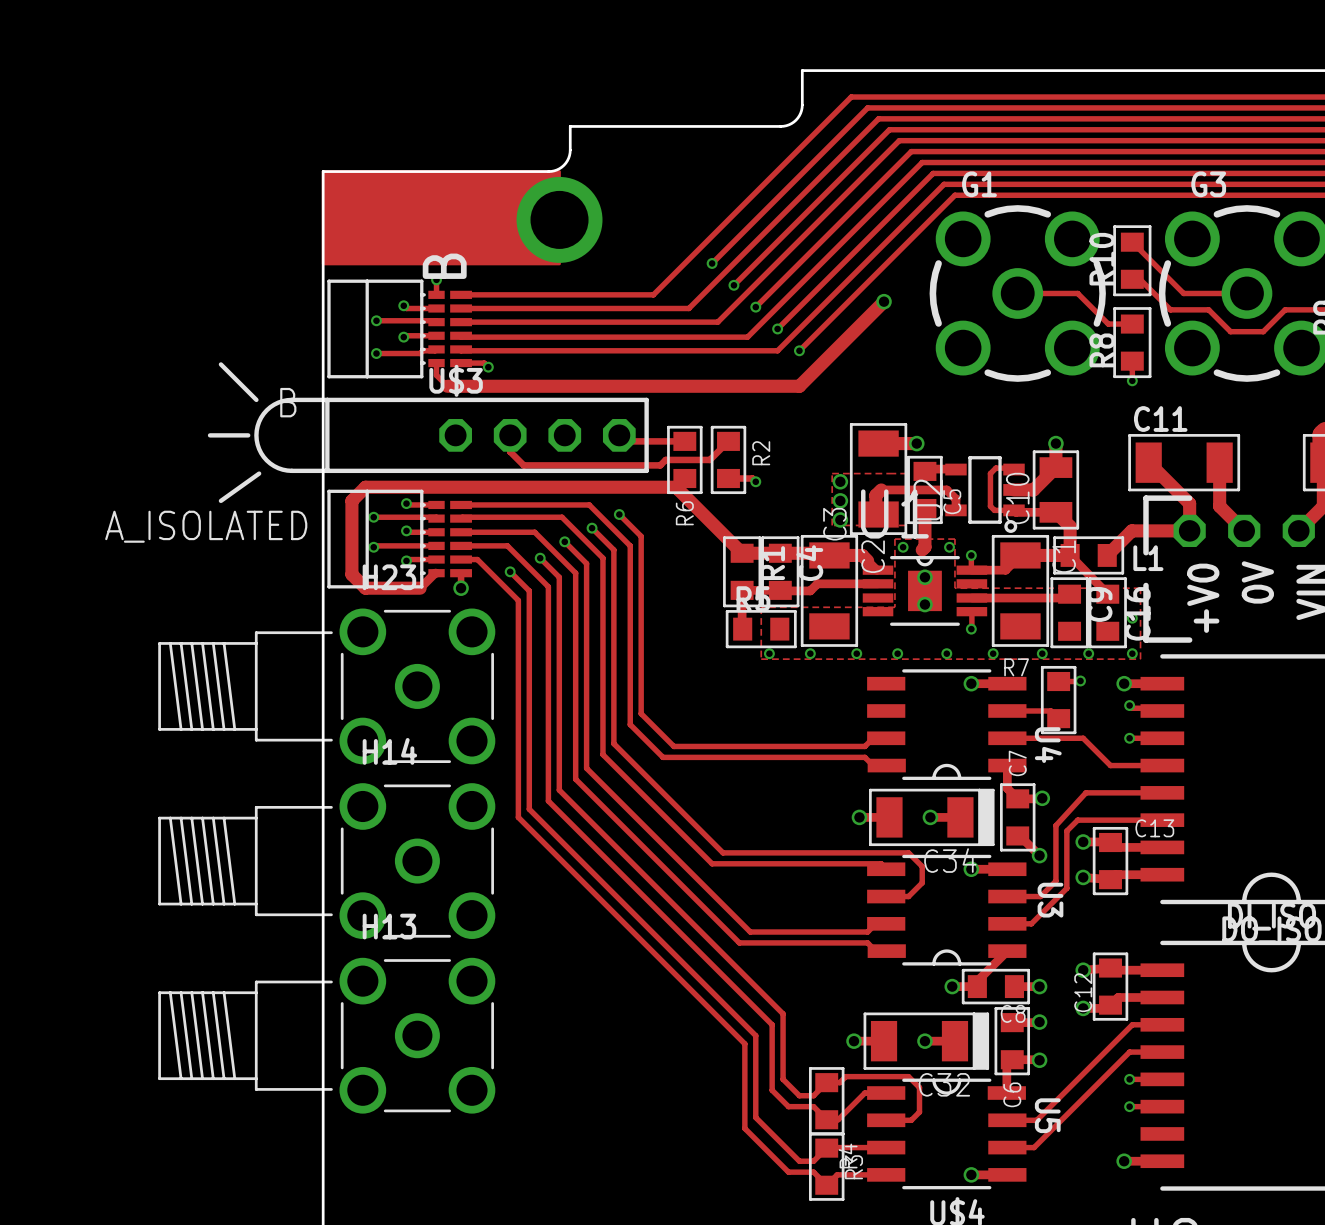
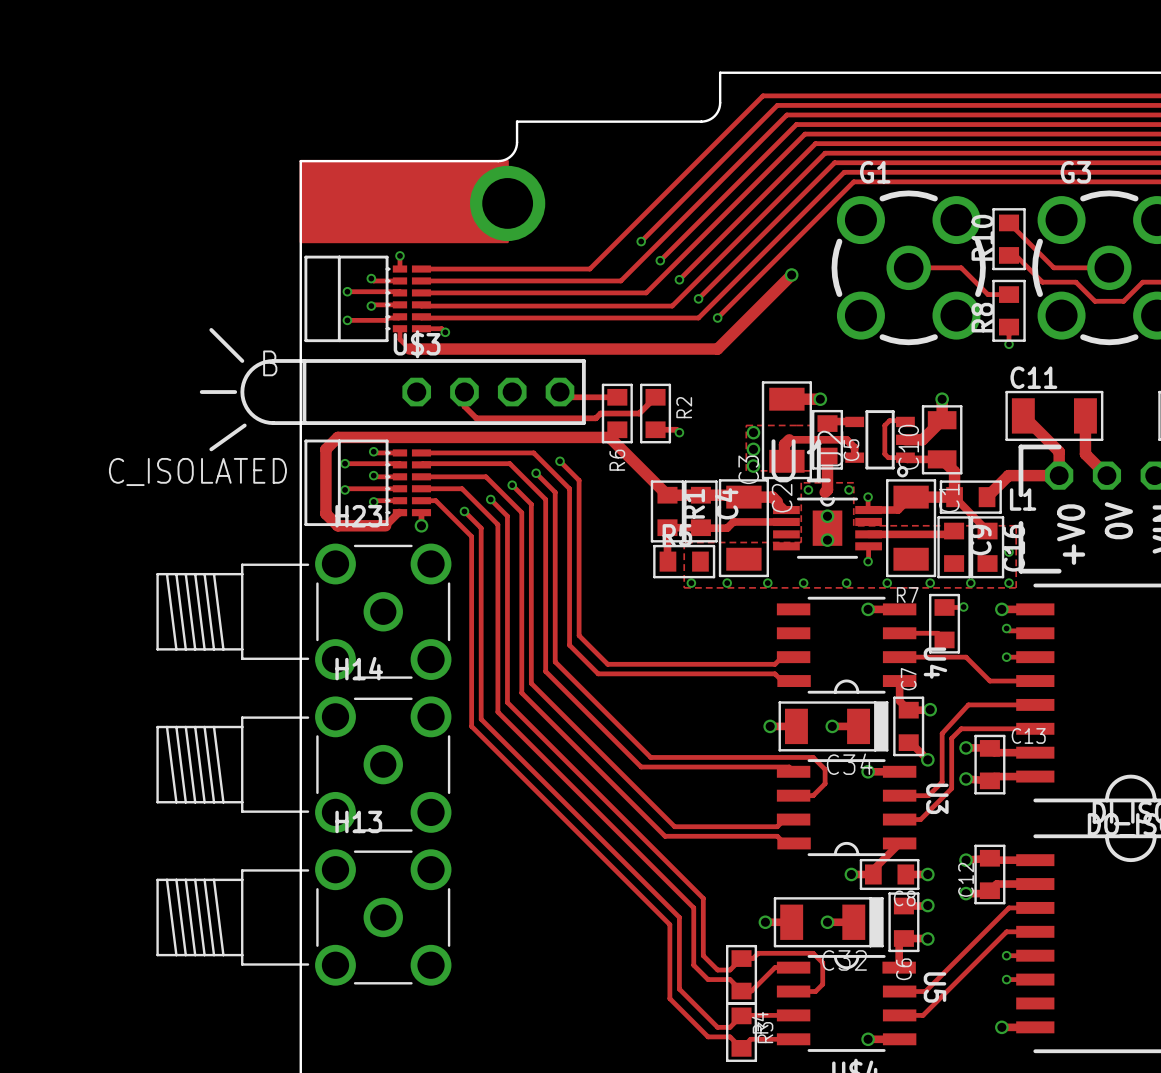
text: B (444, 266) -> none
A_ISOLATED name: A_ISOLATED (206, 526) -> C_ISOLATED (197, 471)

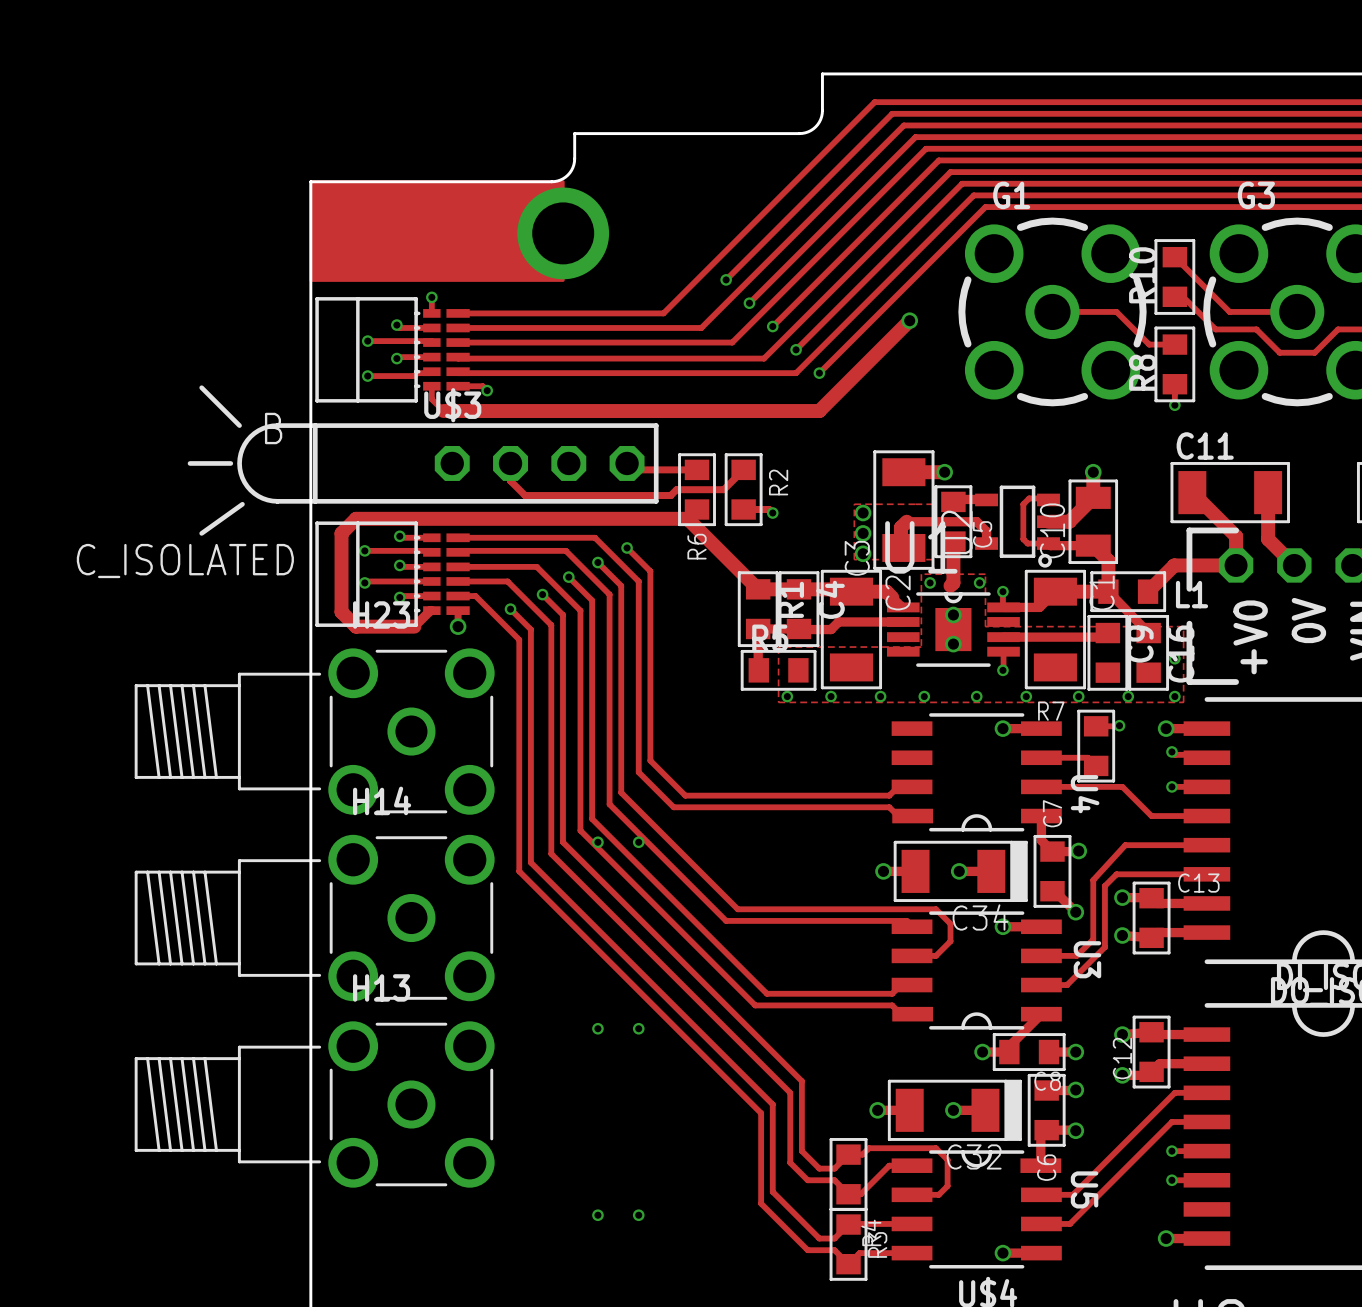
via: none -> (597, 842)
via: none -> (638, 842)
via: none -> (597, 1028)
via: none -> (638, 1028)
via: none -> (597, 1215)
via: none -> (638, 1215)

